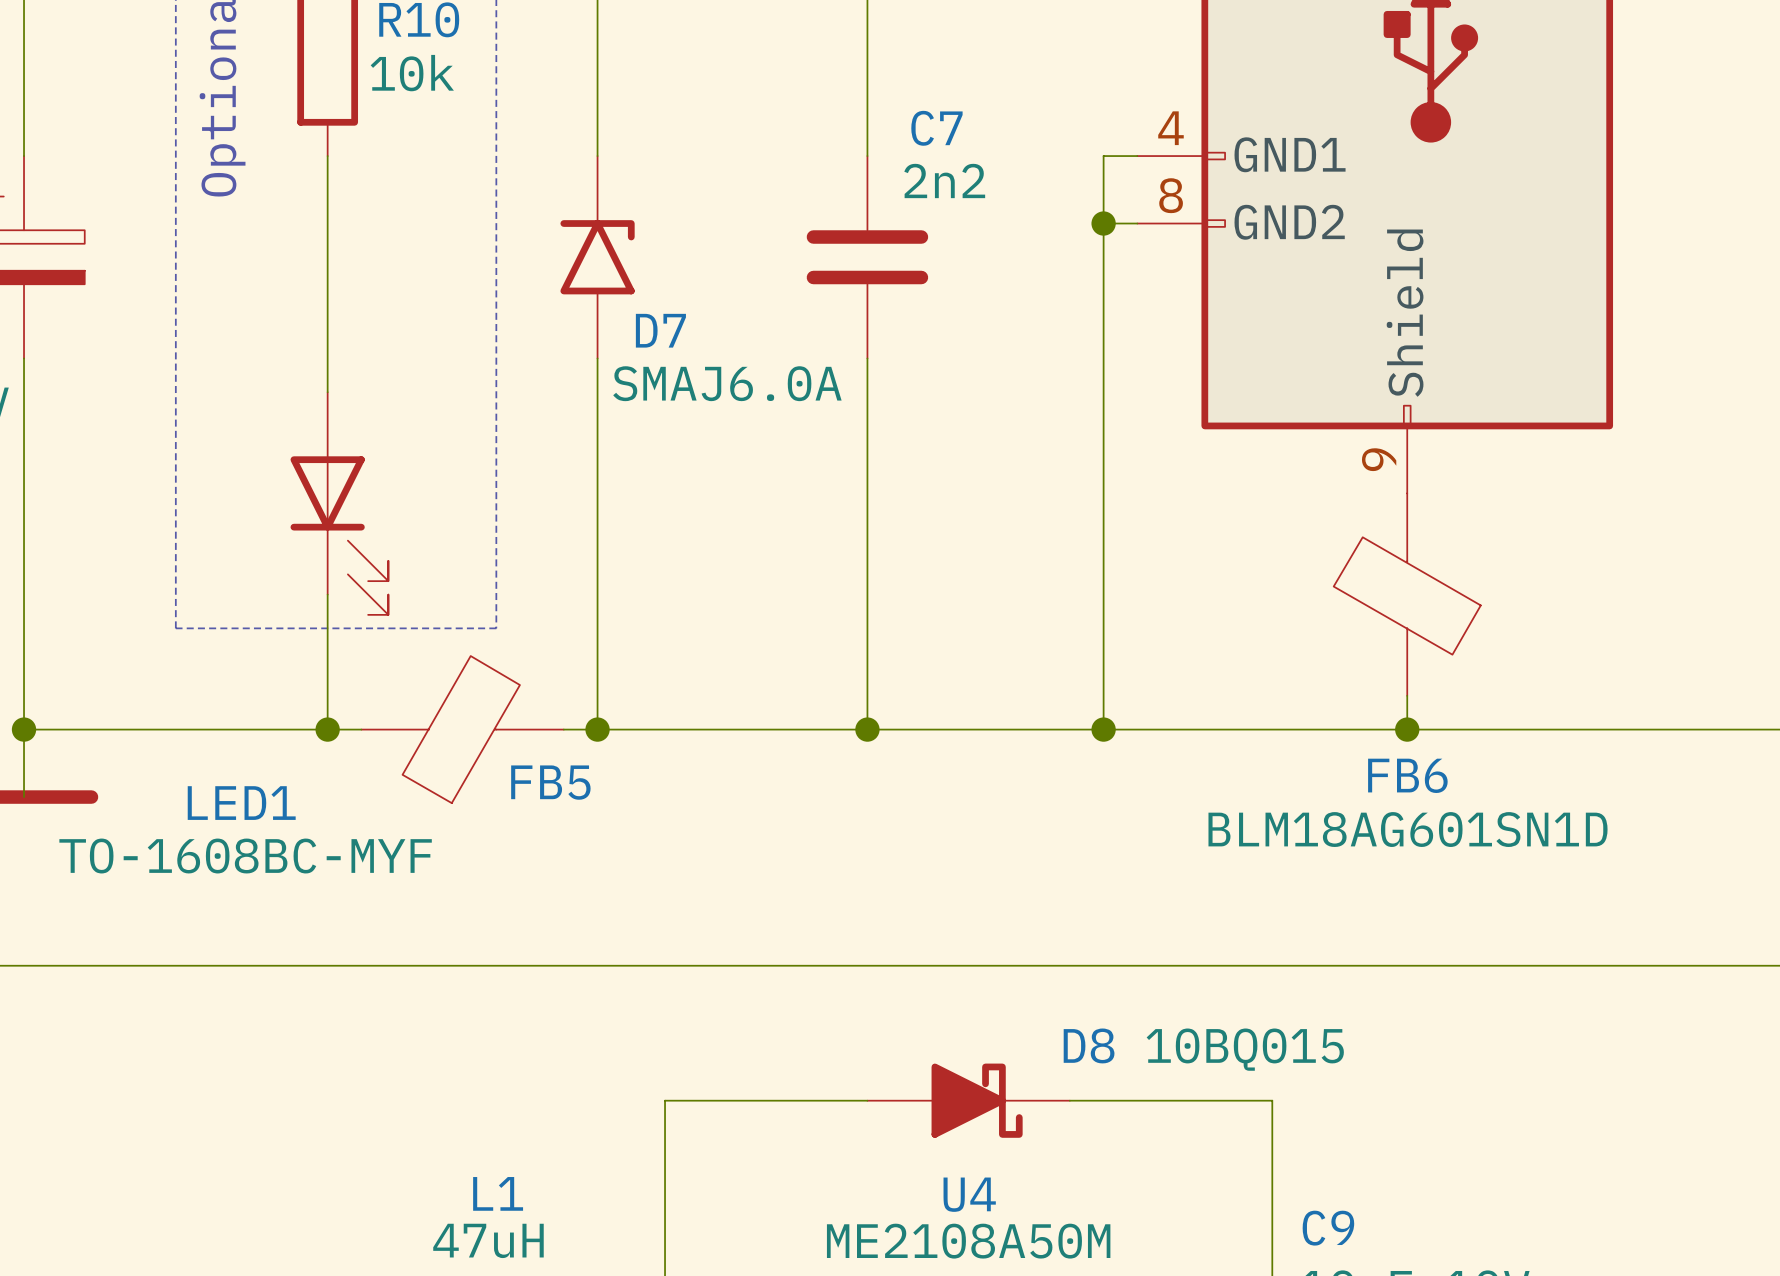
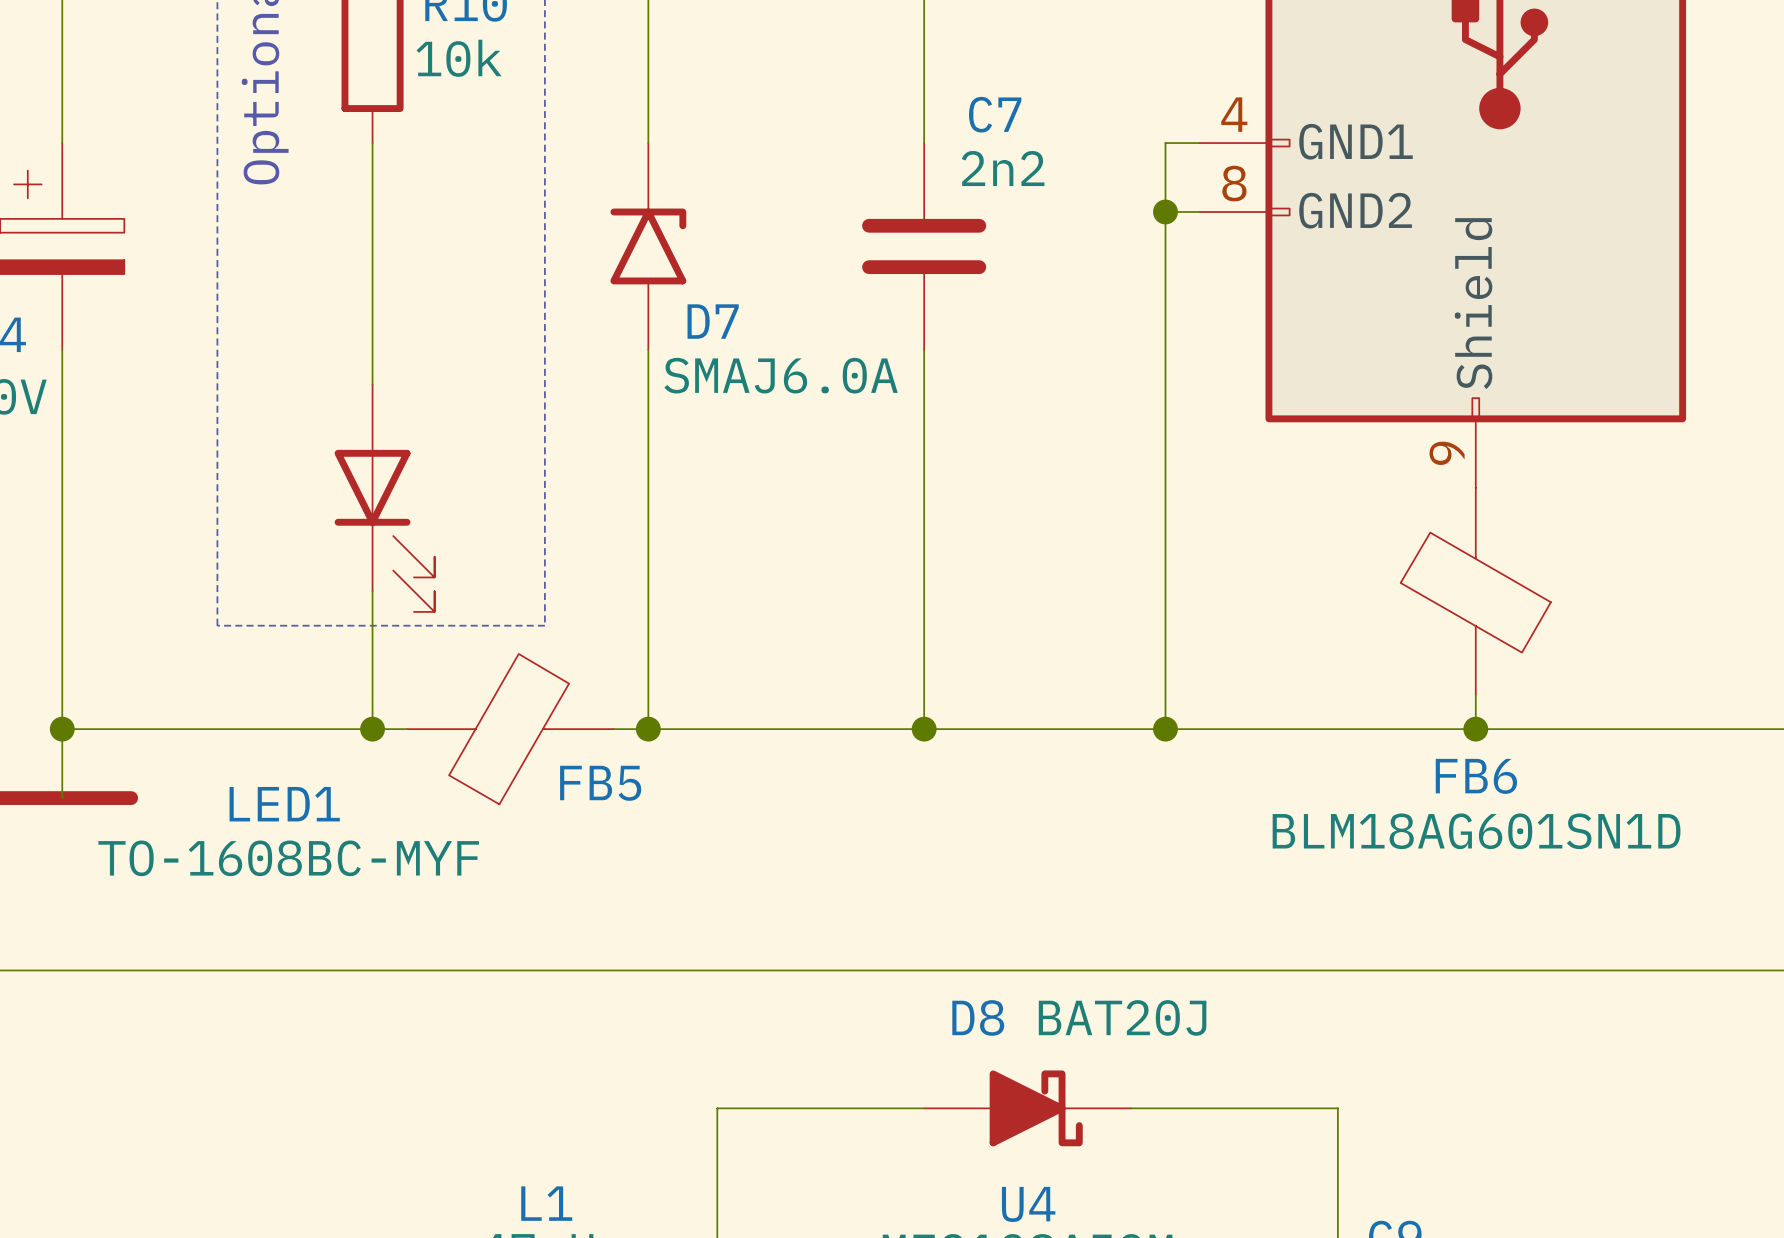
D8 name position: D8 (1089, 1045) -> D8 (978, 1017)
D8 value: 10BQ015 (1245, 1049) -> BAT20J (1122, 1017)

